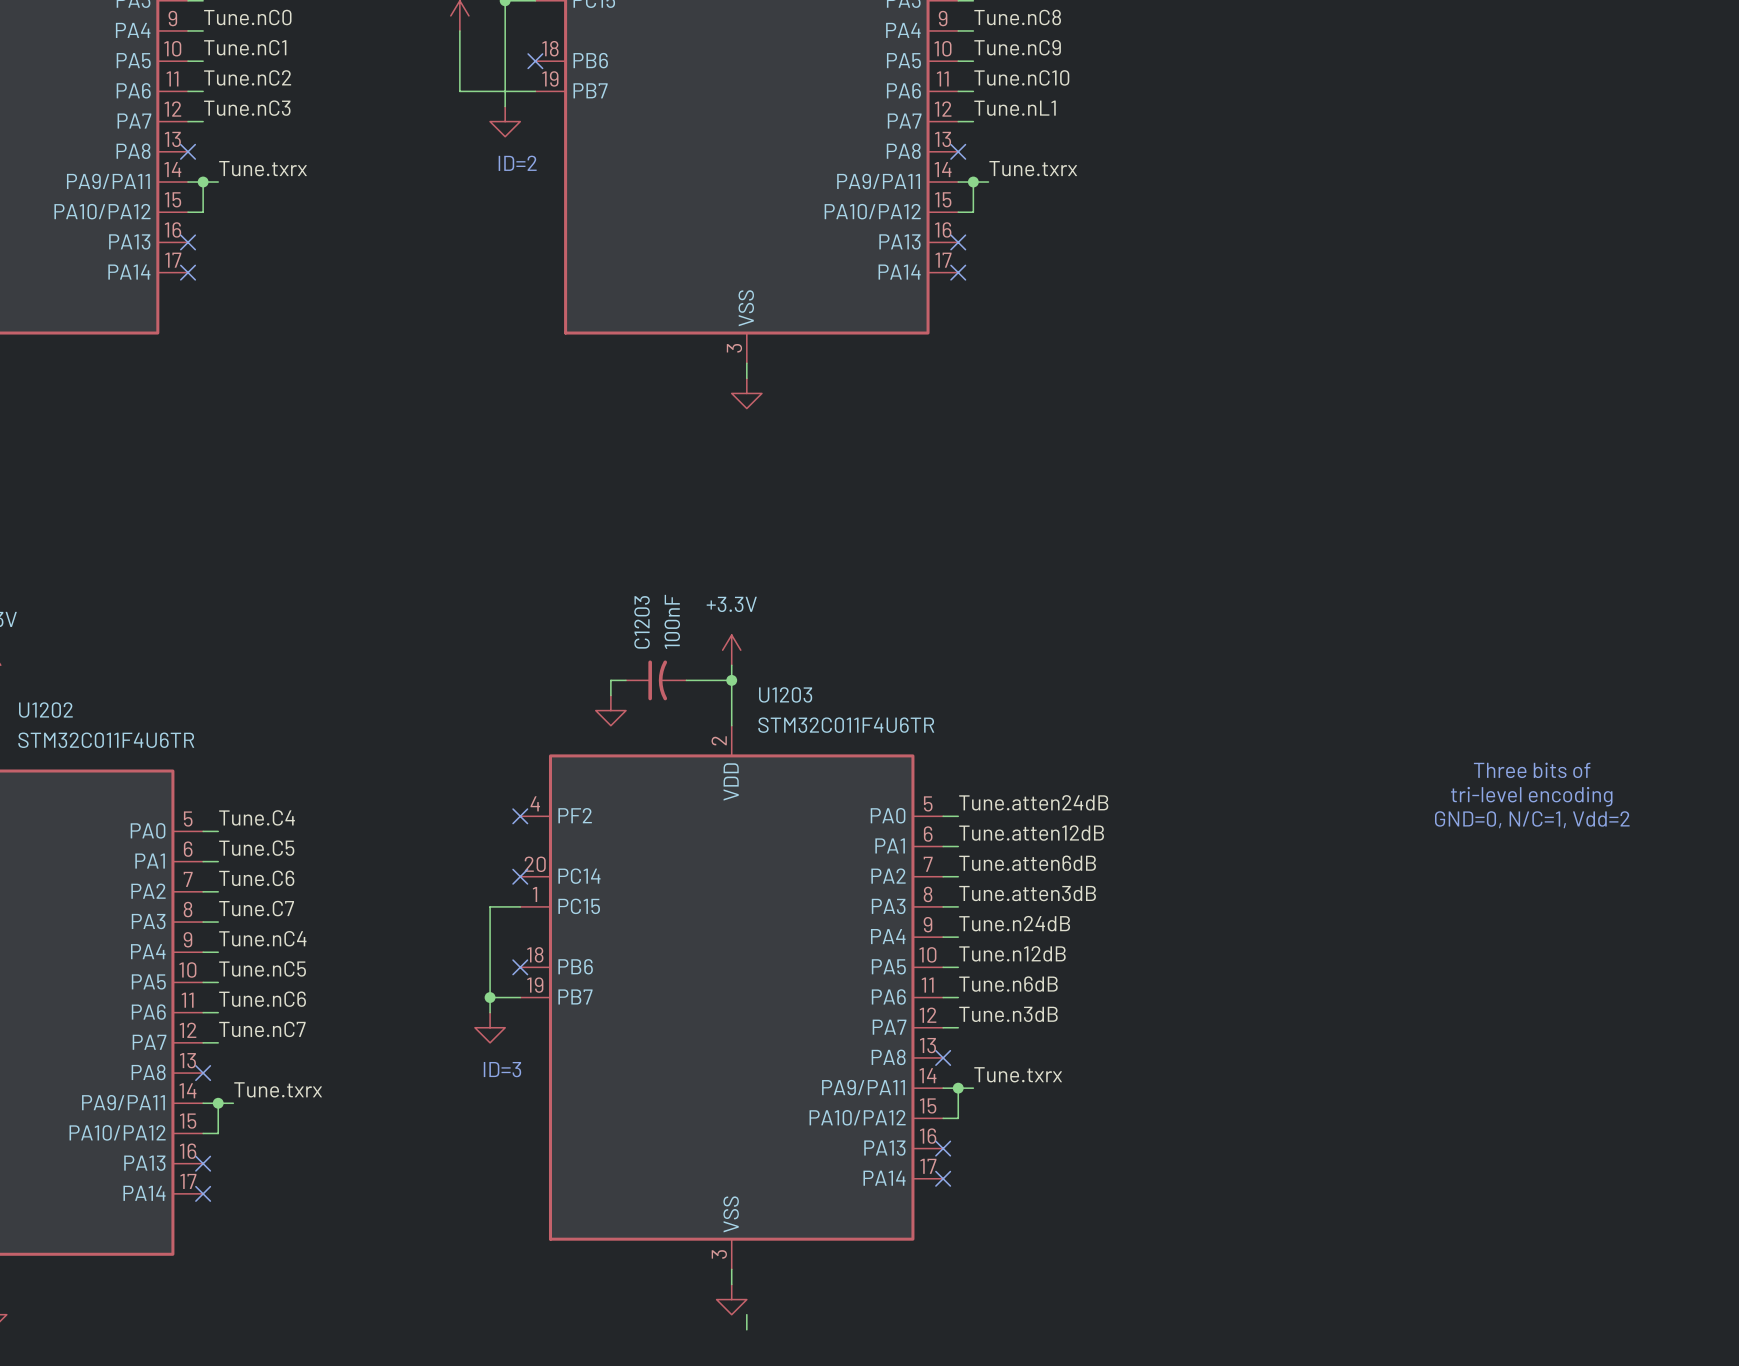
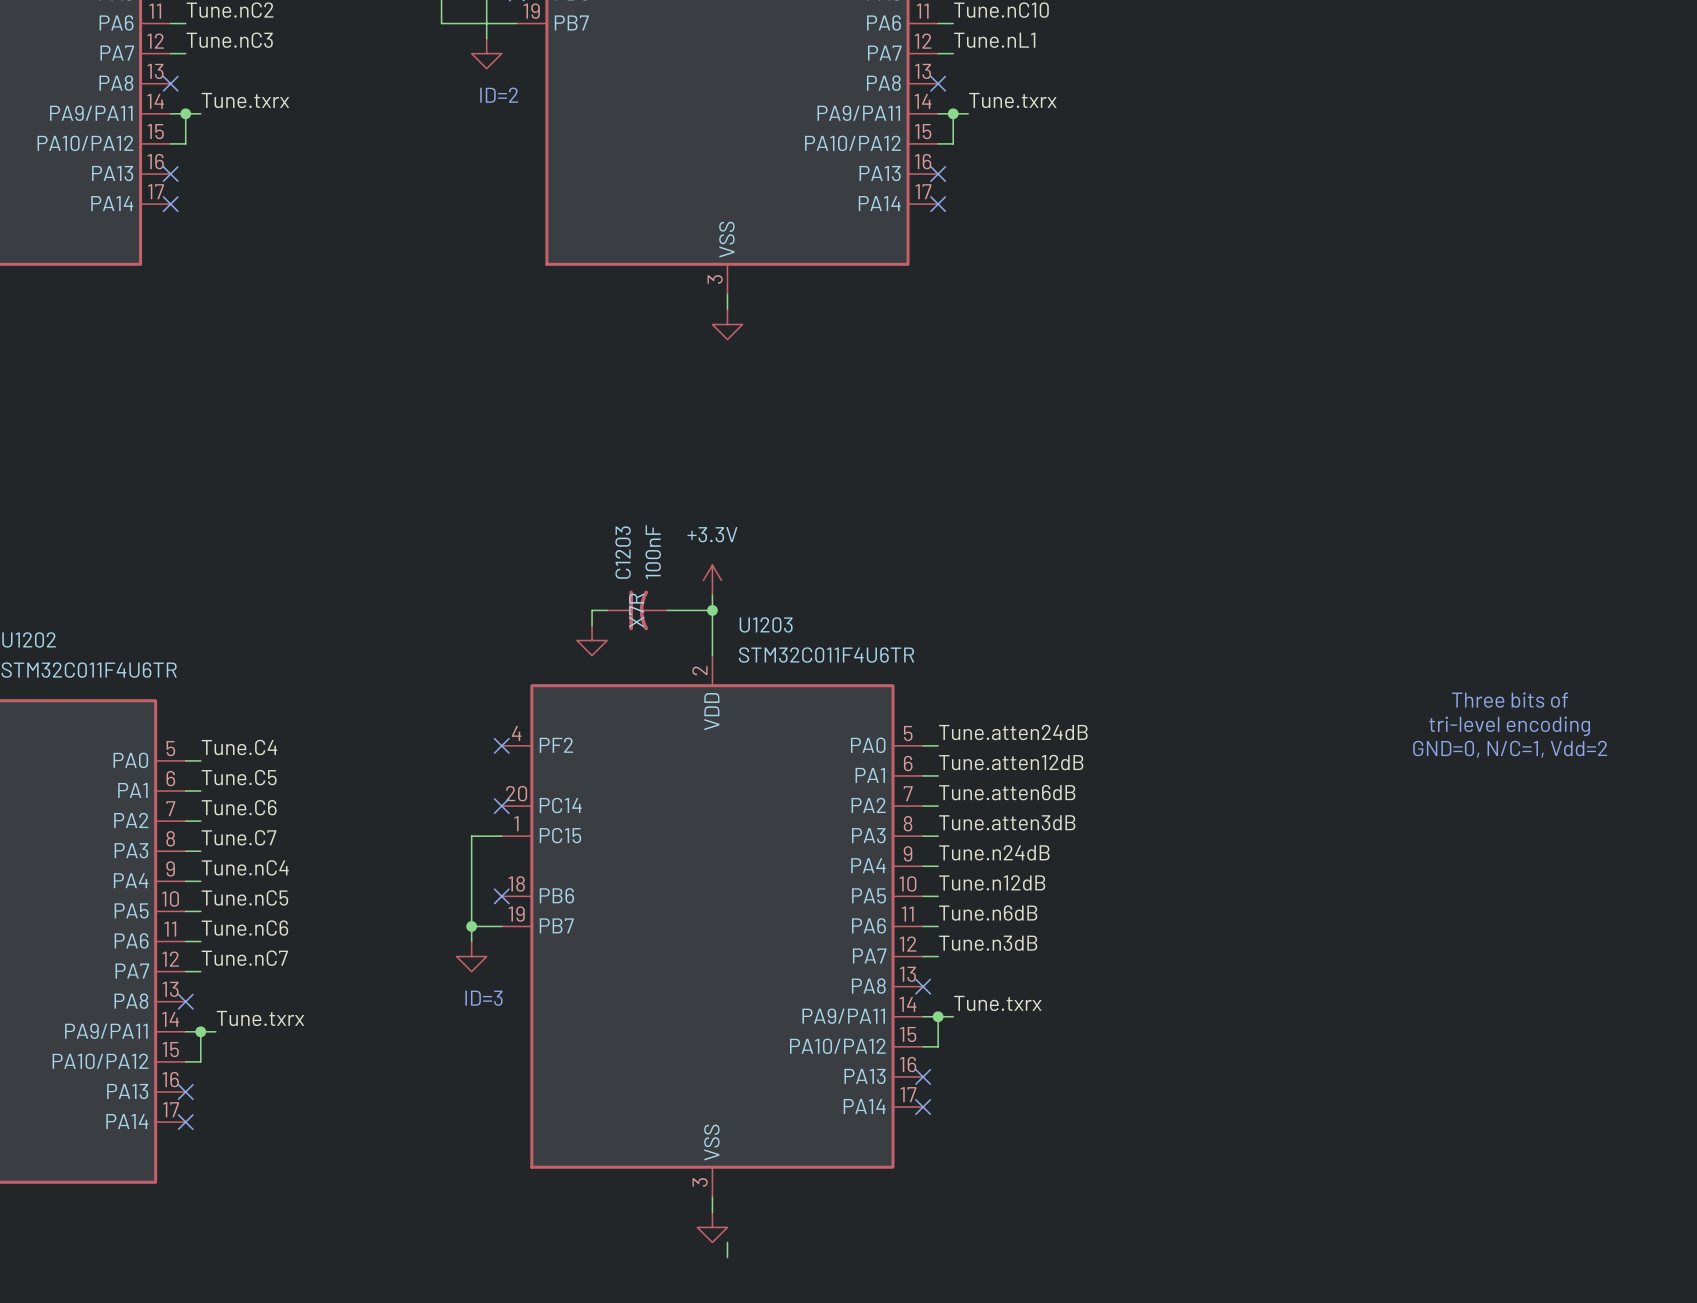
C1203 text: none -> X7R (636, 610)

